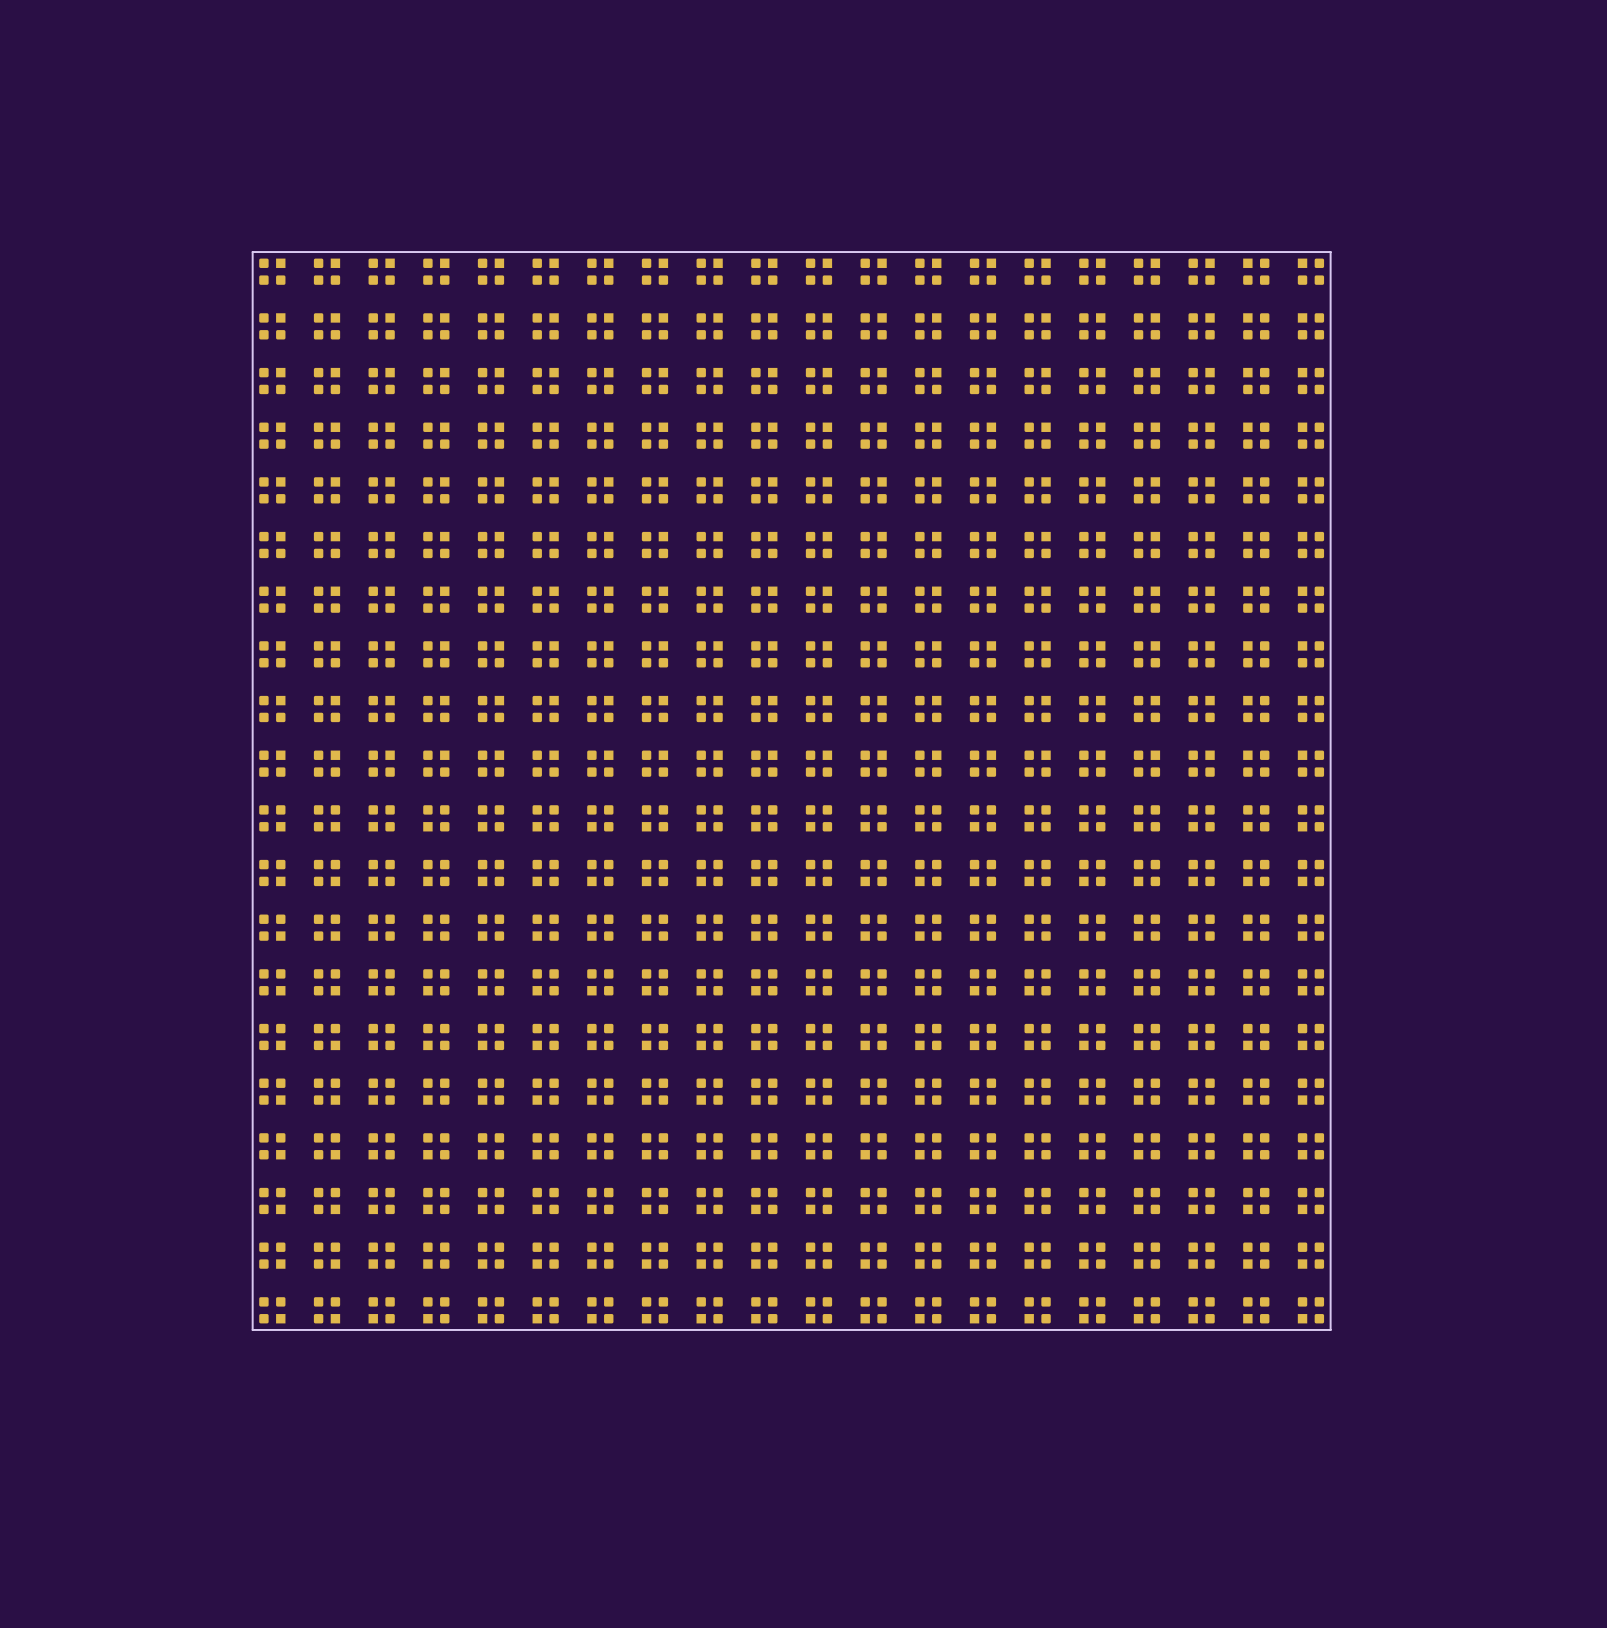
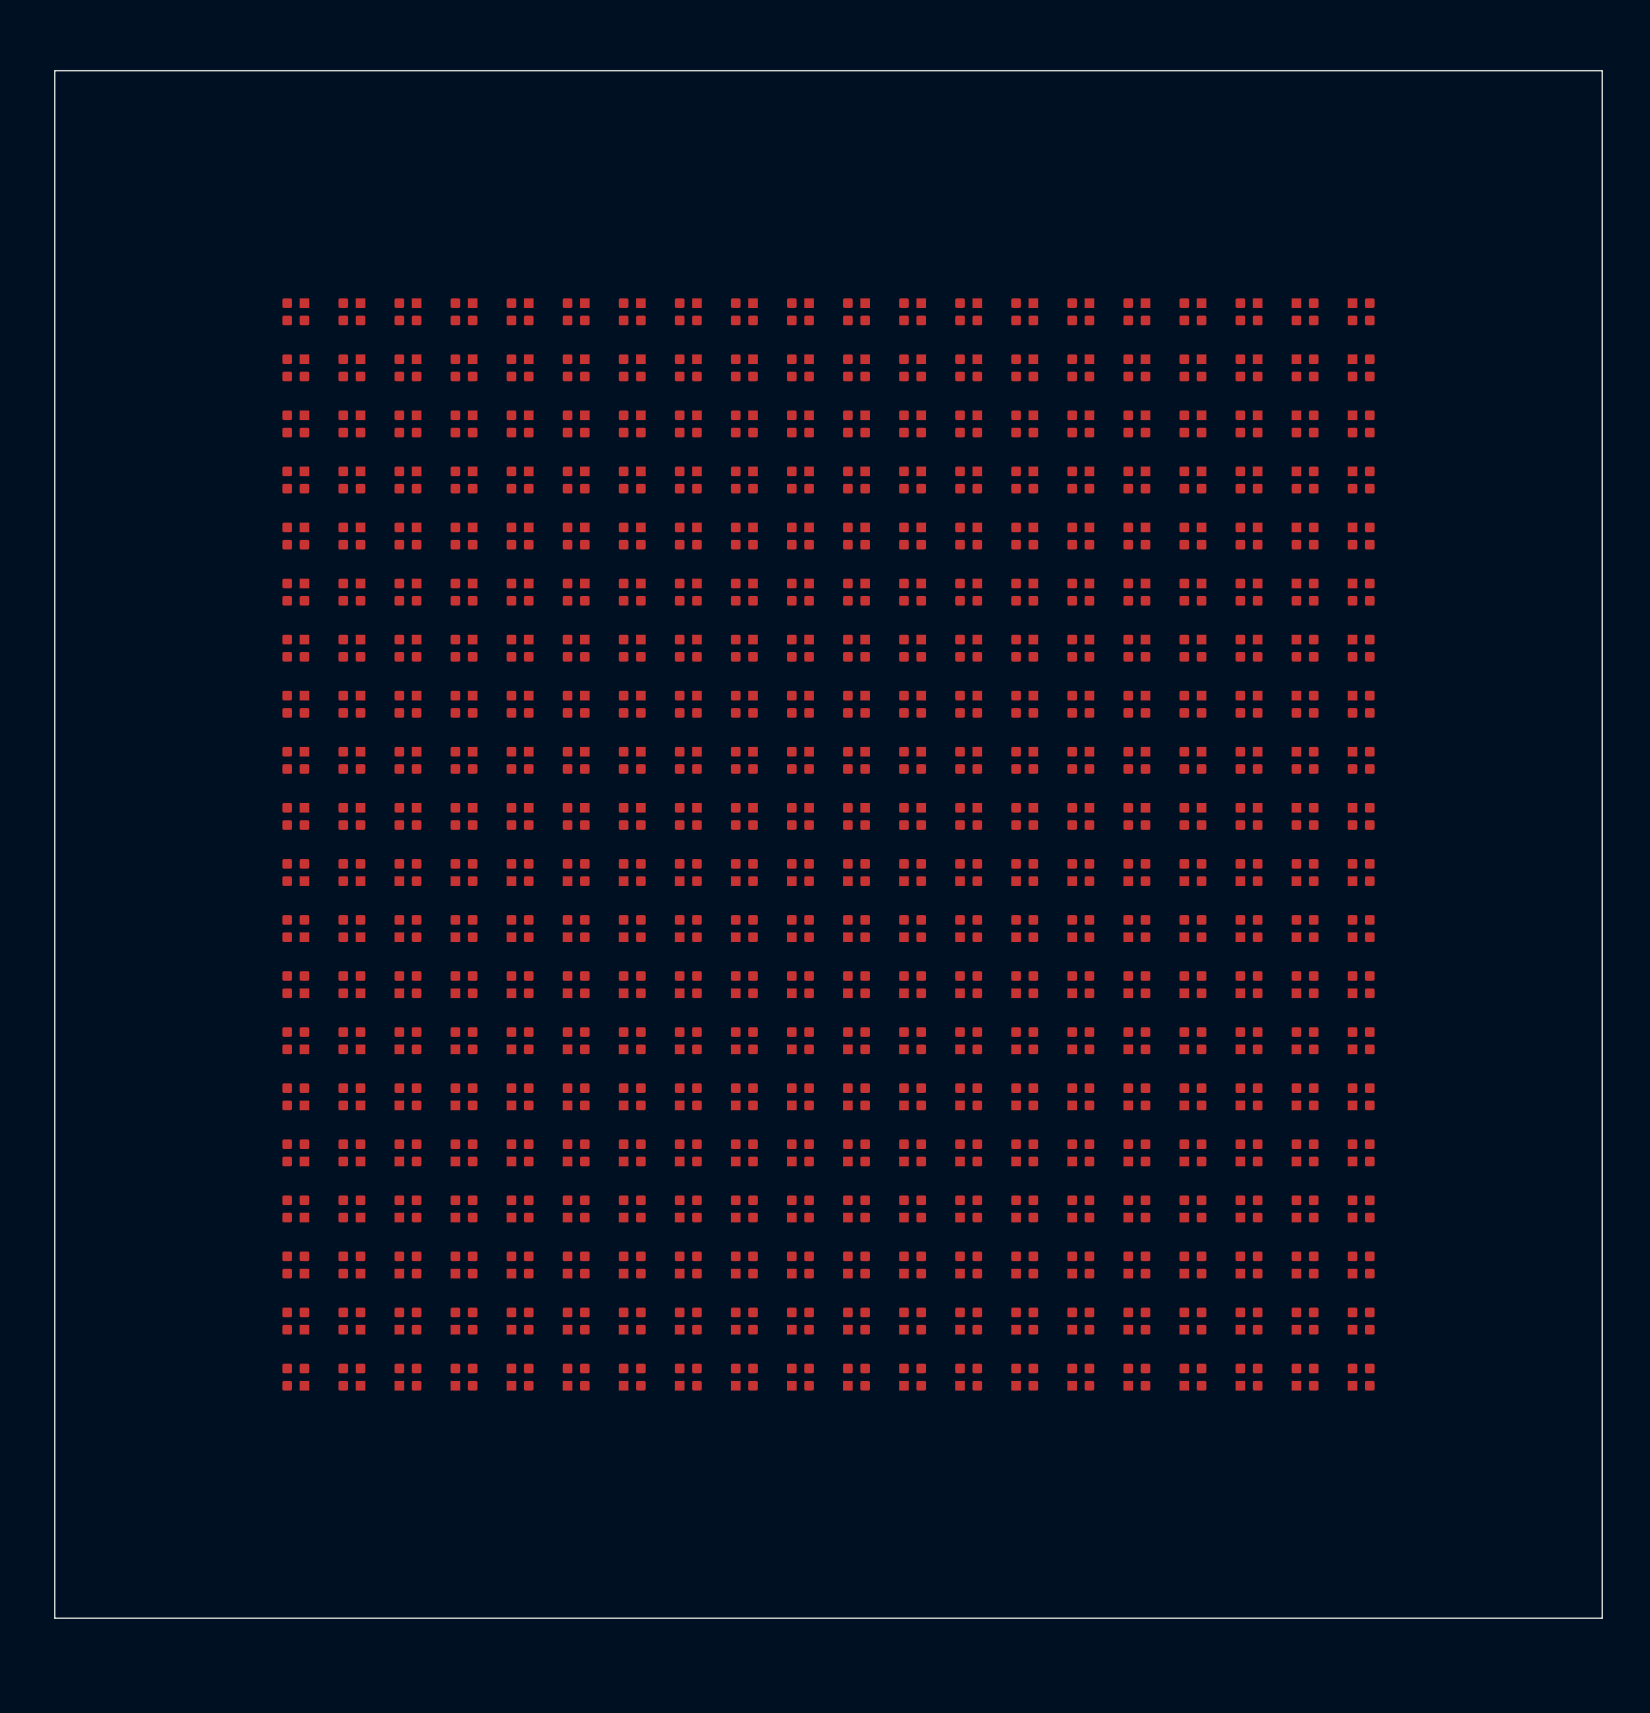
board edge: (252, 252) (1330, 252) (1330, 1329) (252, 1329) (252, 252) -> (54, 70) (54, 1618) (1602, 1618) (1602, 70) (54, 70)

